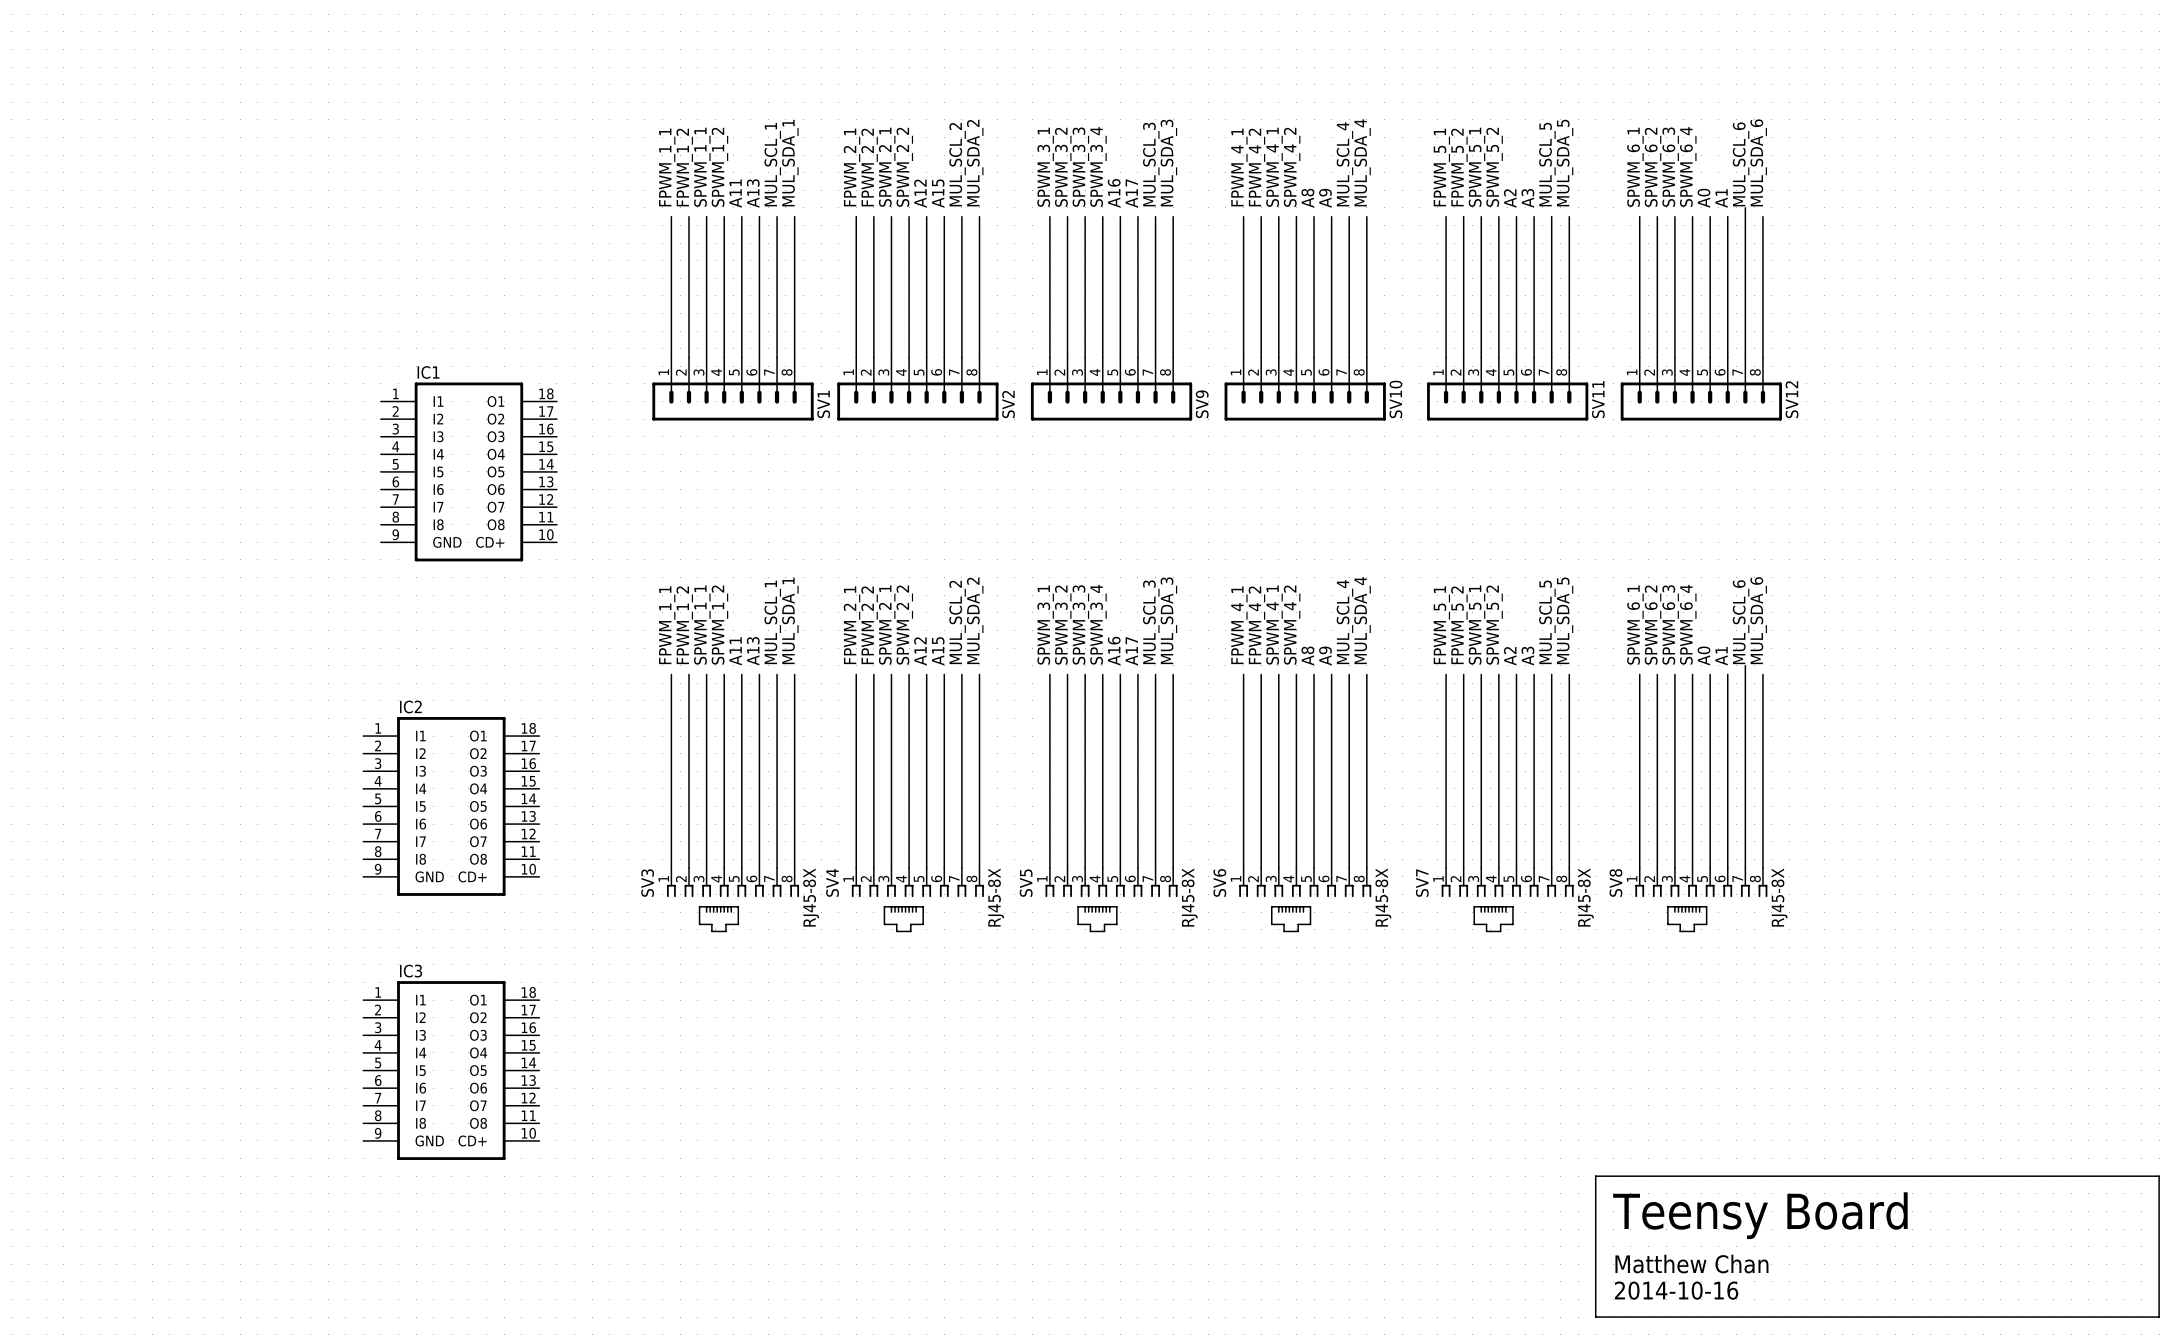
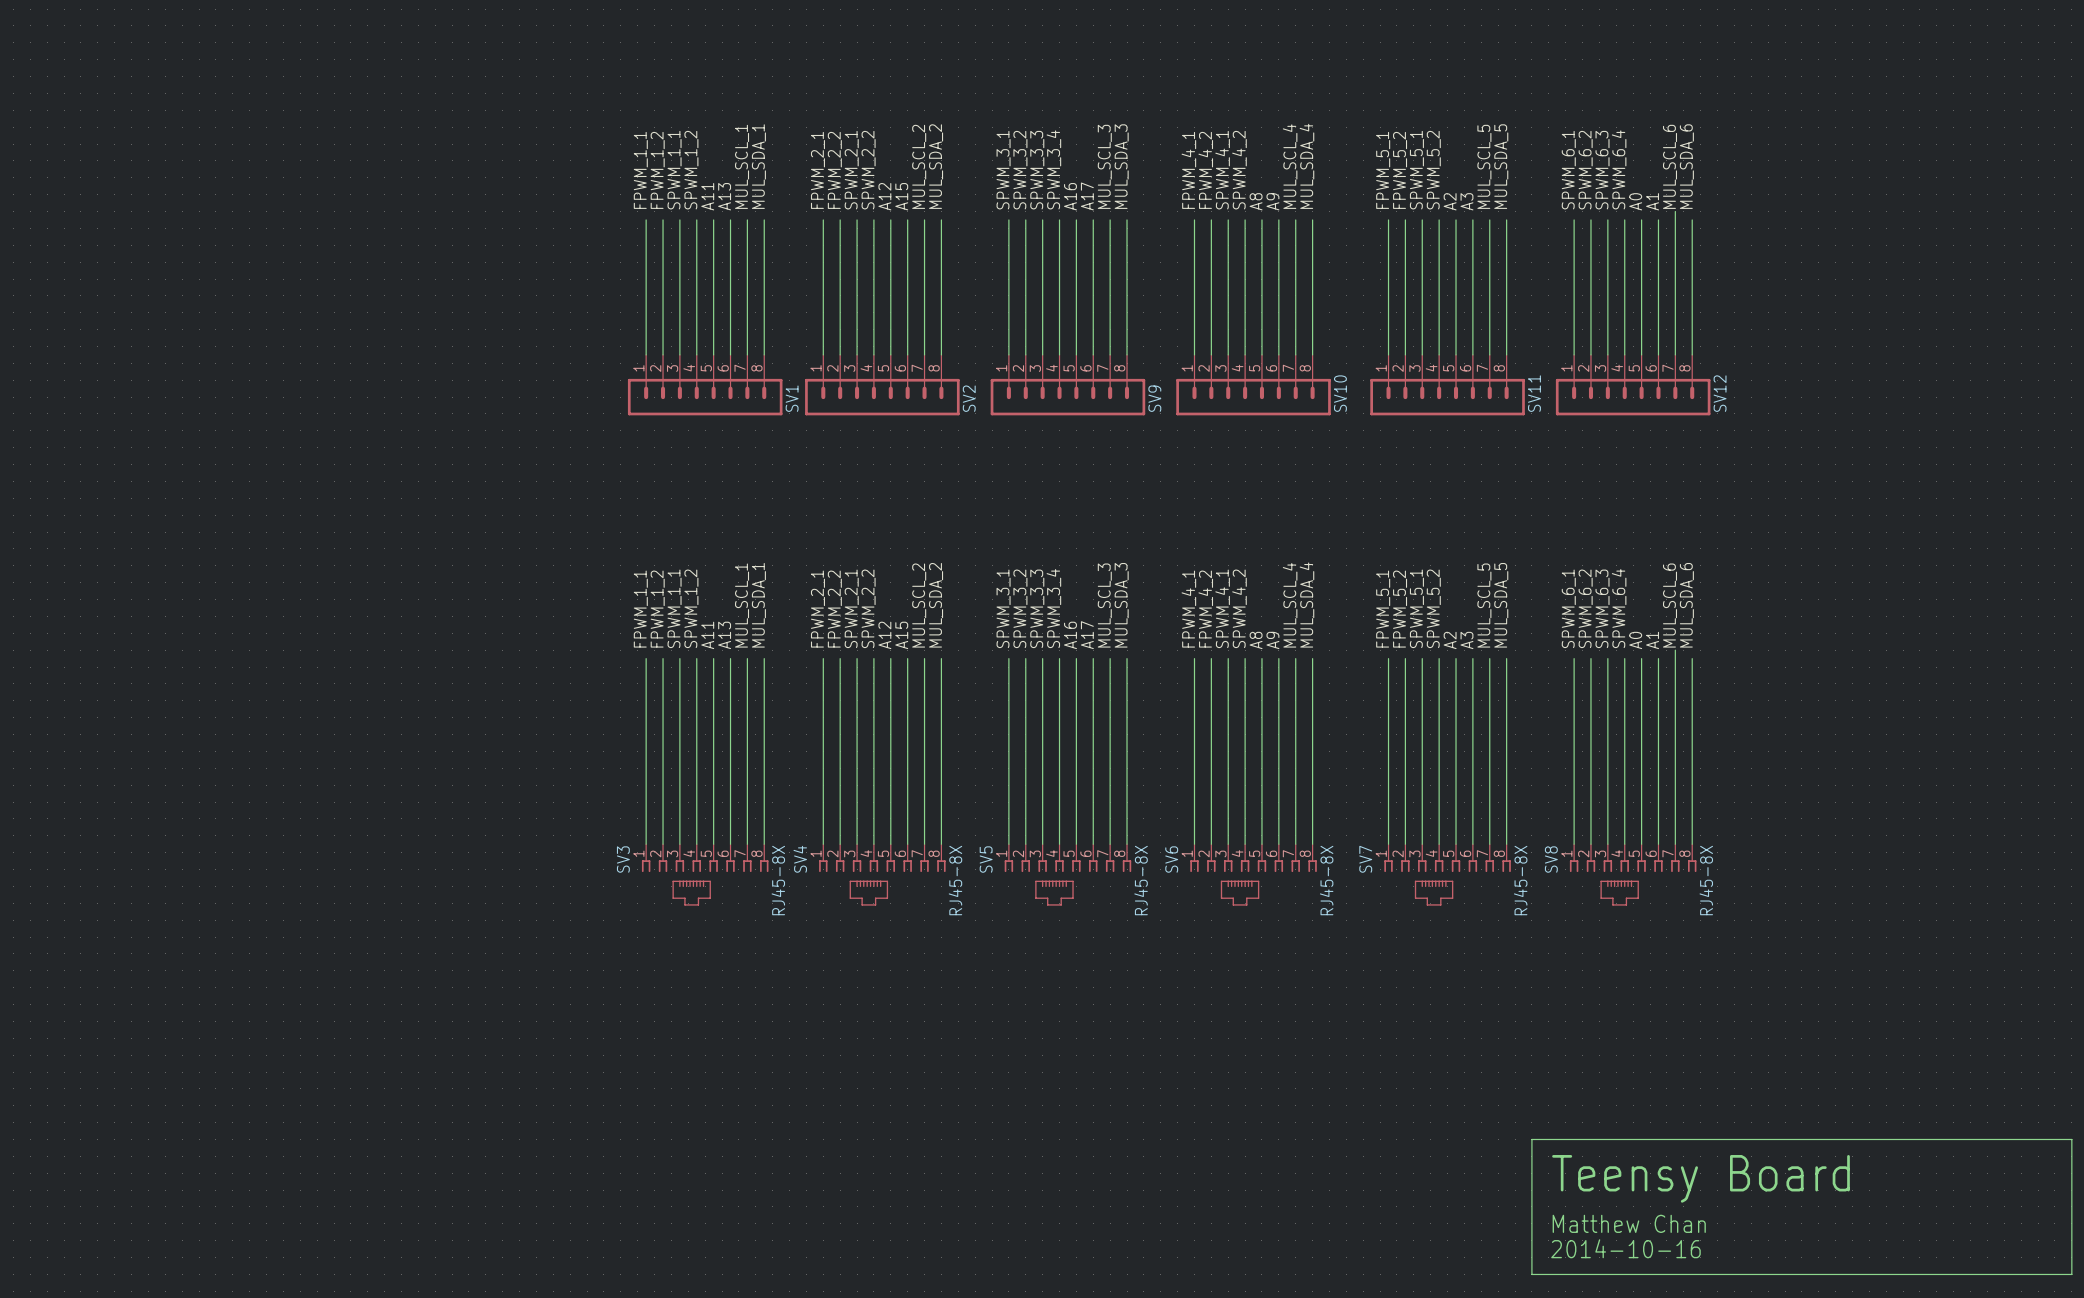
IC1: (468, 471) -> none
IC2: (451, 806) -> none
IC3: (451, 1070) -> none

